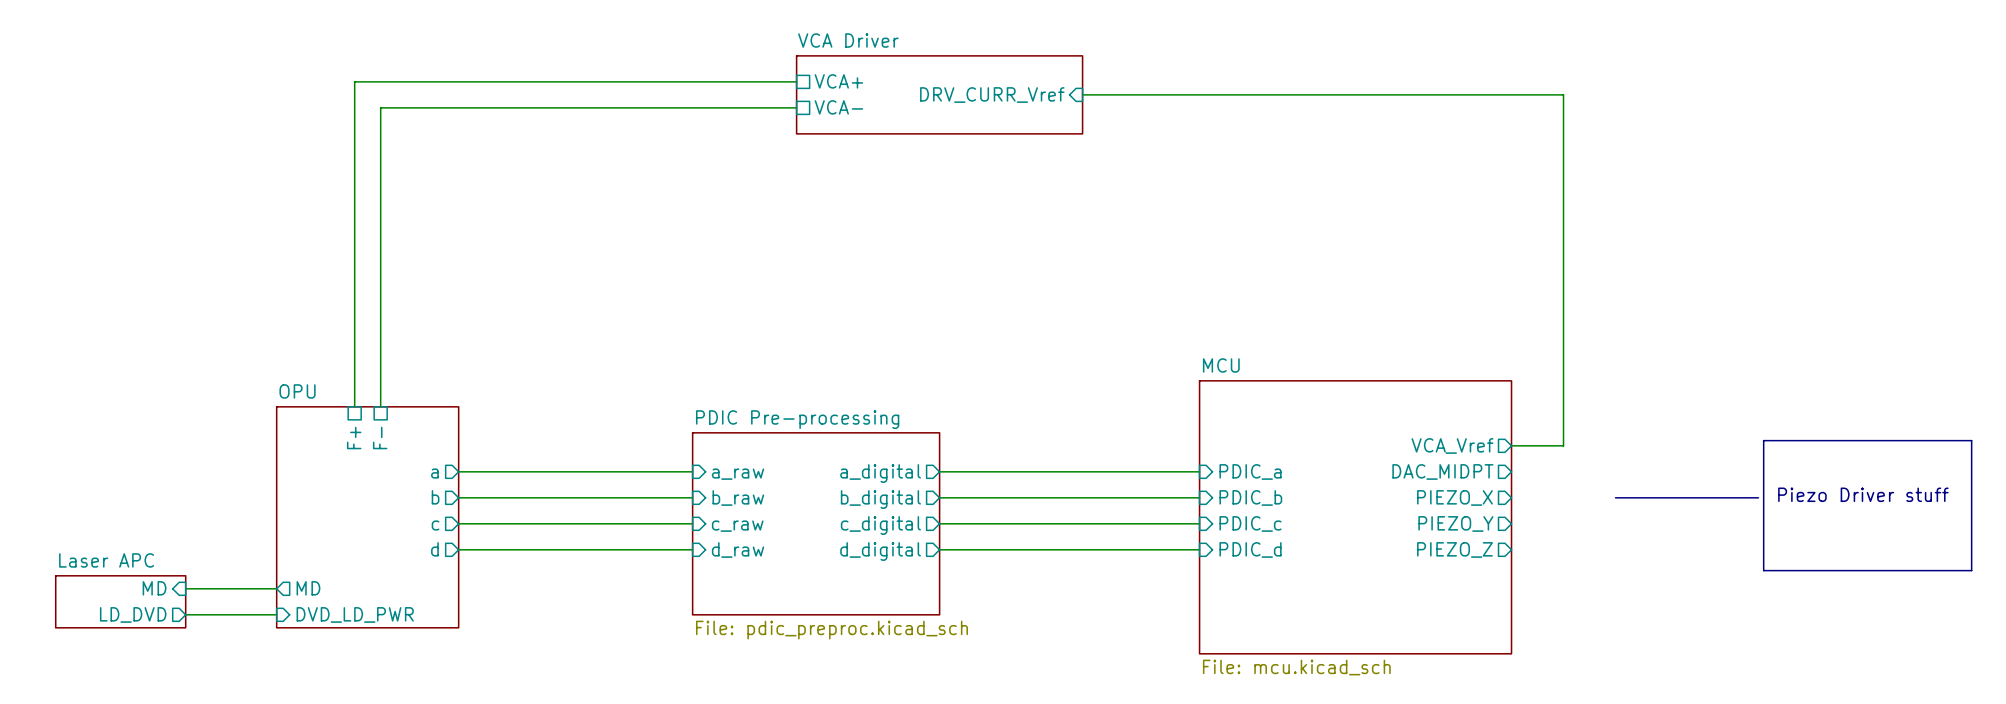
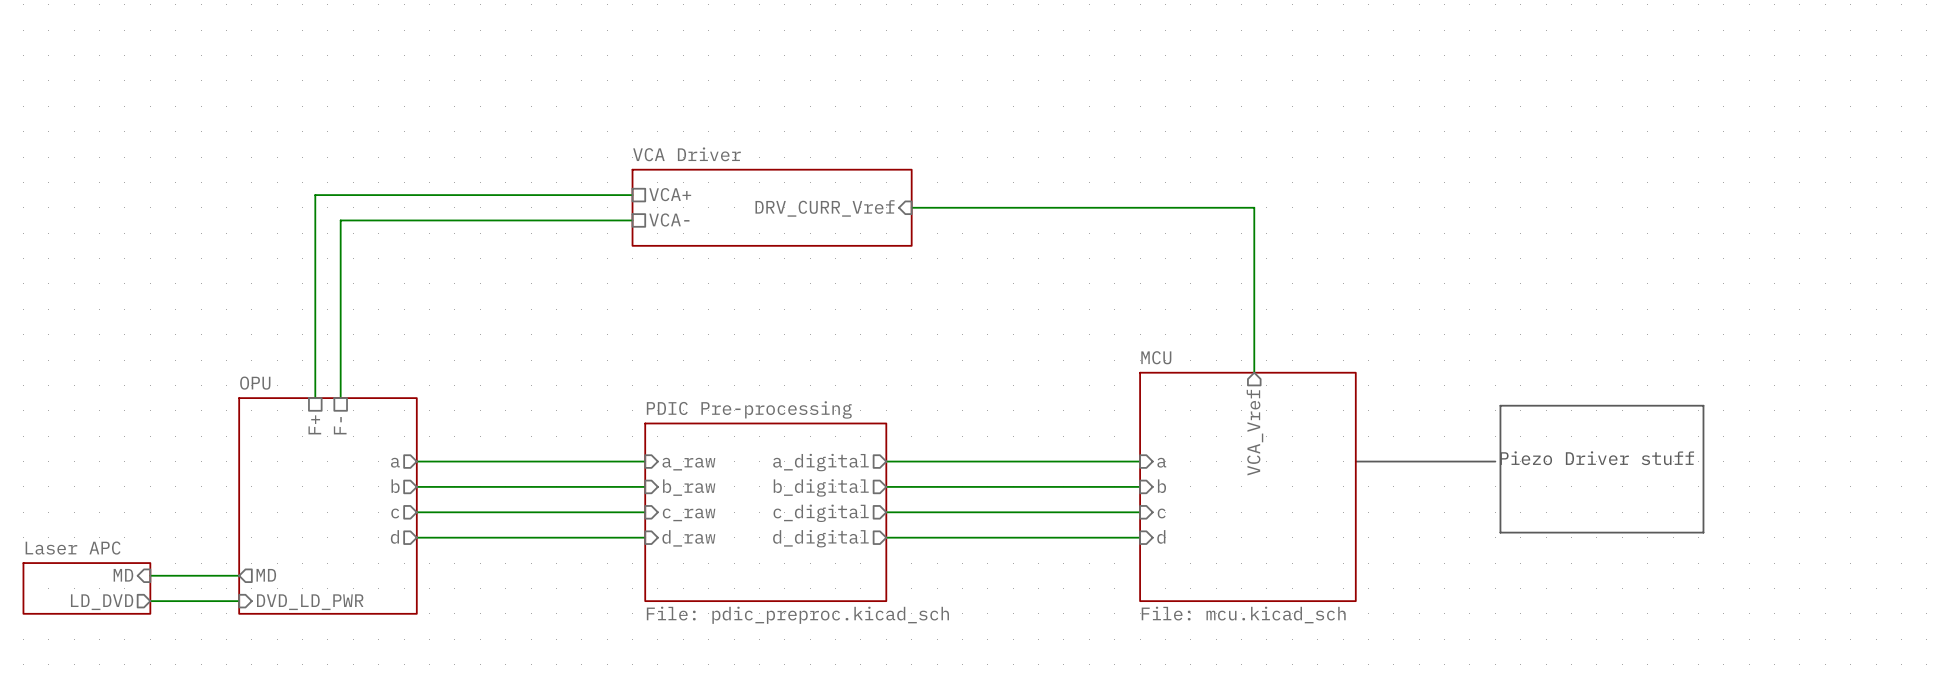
wire: (796, 81) (354, 81) (354, 198) -> (632, 195) (315, 195)
sheet pin position: VCA+ (838, 81) -> VCA+ (670, 194)
sheet VCA Driver position: (939, 94) -> (772, 207)
wire: (1082, 94) (1563, 94) (1563, 445) (1511, 445) -> none
sheet pin position: DRV_CURR_Vref (992, 95) -> DRV_CURR_Vref (825, 208)
wire: (796, 107) (380, 107) (380, 224) -> (632, 220) (340, 220)
sheet pin position: VCA- (838, 107) -> VCA- (669, 219)
wire: none -> (911, 207) (1254, 207) (1254, 372)
line: (1763, 440) (1971, 440) (1971, 570) (1763, 570) (1763, 440) -> (1500, 405) (1703, 405) (1703, 532) (1500, 532) (1500, 405)
sheet pin rotation: 0° (1452, 445) -> 90° counterclockwise (1254, 432)
sheet pin position: VCA_Vref (1452, 445) -> VCA_Vref (1254, 432)
sheet pin: PDIC_a (1250, 471) -> a (1161, 462)
sheet pin: DAC_MIDPT (1442, 471) -> none
text position: Piezo Driver stuff (1863, 494) -> Piezo Driver stuff (1597, 458)
sheet pin: PDIC_b (1250, 497) -> b (1161, 486)
sheet MCU: none -> File: mcu.kicad_sch (1247, 486)
sheet pin: PIEZO_X (1454, 497) -> none
line: (1615, 497) (1758, 497) -> (1355, 461) (1495, 461)
sheet MCU: File: mcu.kicad_sch (1355, 517) -> none
sheet pin: PDIC_c (1250, 523) -> c (1161, 513)
sheet pin: PIEZO_Y (1455, 523) -> none
sheet pin: PDIC_d (1250, 549) -> d (1161, 536)
sheet pin: PIEZO_Z (1454, 549) -> none

